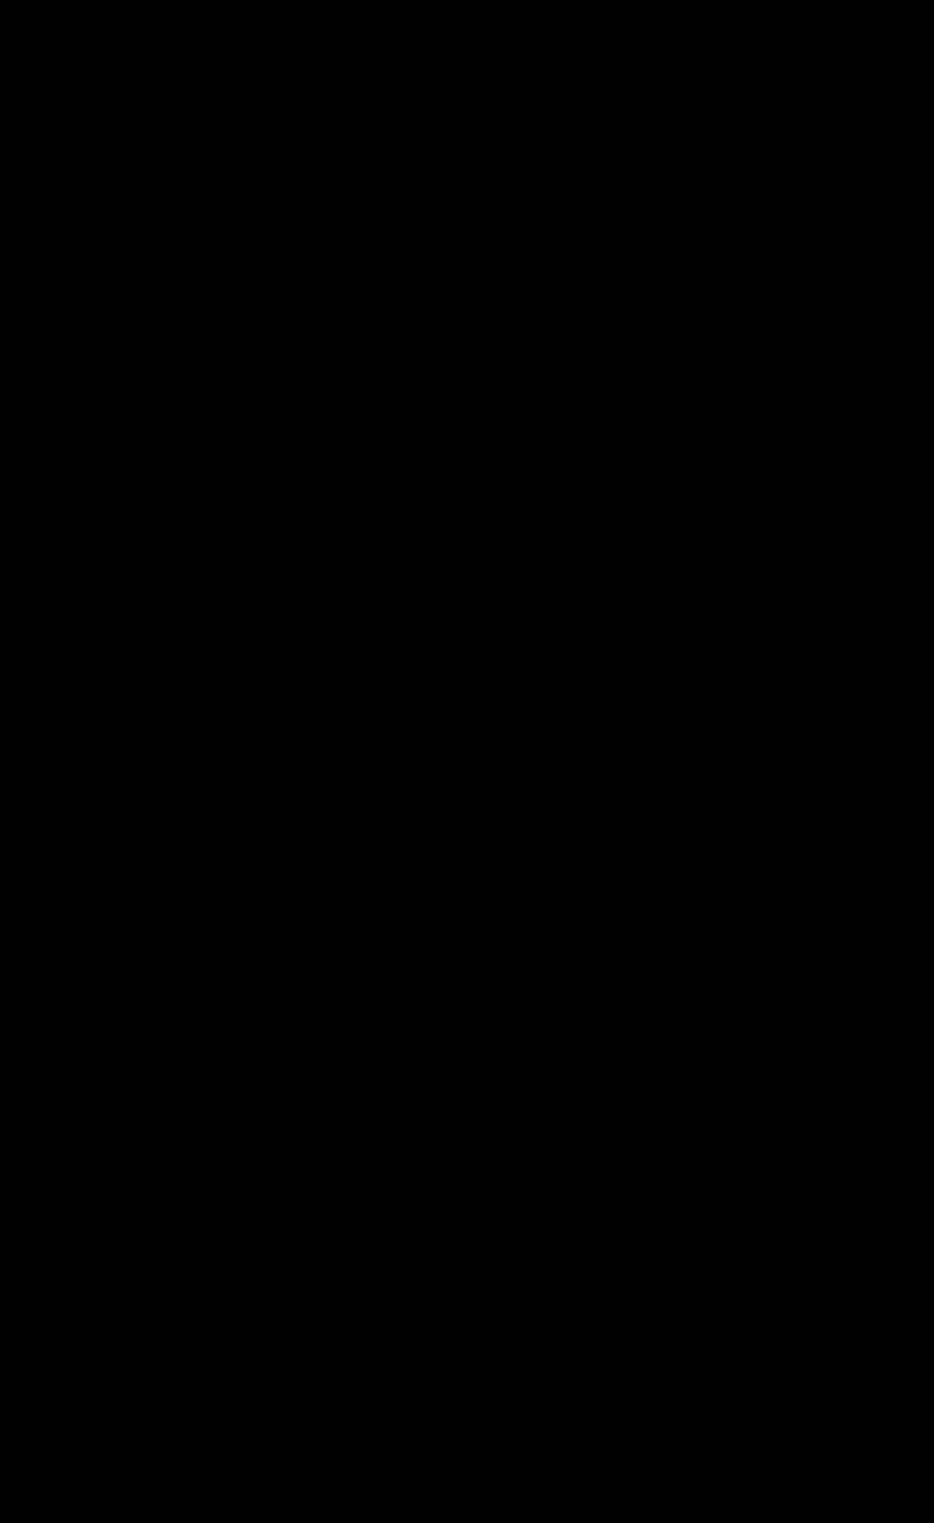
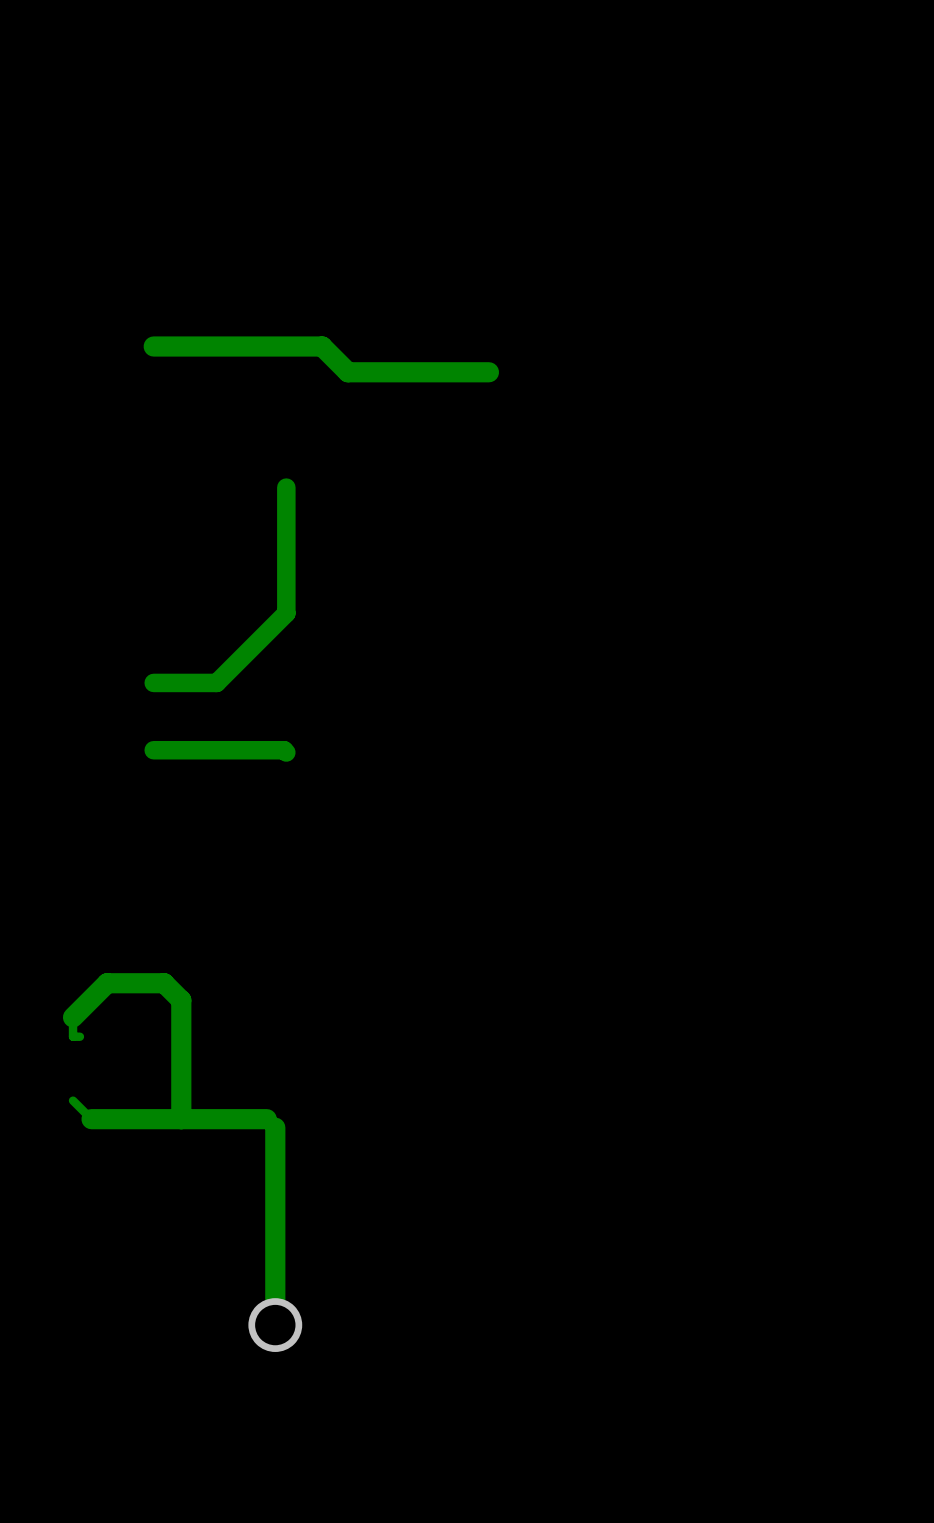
track: none -> (153, 346) (322, 346) (347, 372) (488, 372)
track: none -> (286, 487) (286, 613) (216, 682) (153, 682)
track: none -> (153, 750) (284, 750) (286, 752)
track: none -> (79, 1036) (73, 1036) (73, 1017) (107, 983) (164, 983) (181, 1000) (181, 1119)
track: none -> (73, 1100) (91, 1119) (266, 1119) (275, 1127) (275, 1325)
via: none -> (275, 1325)

